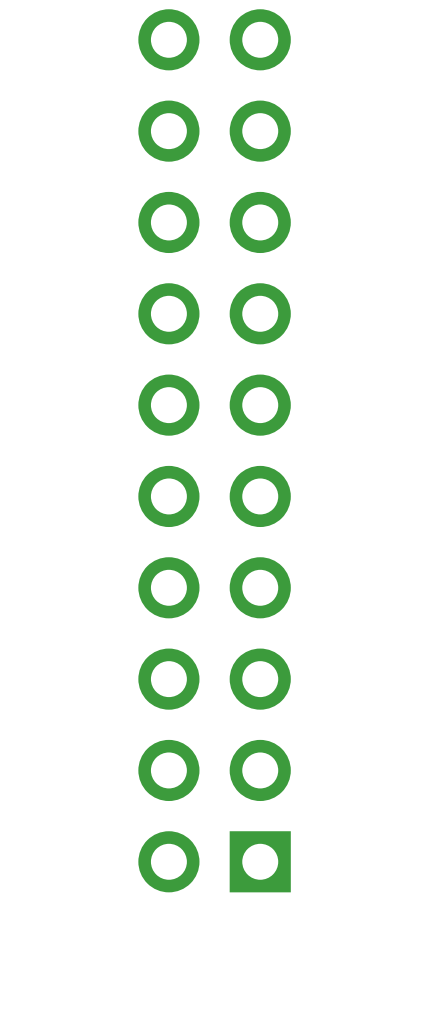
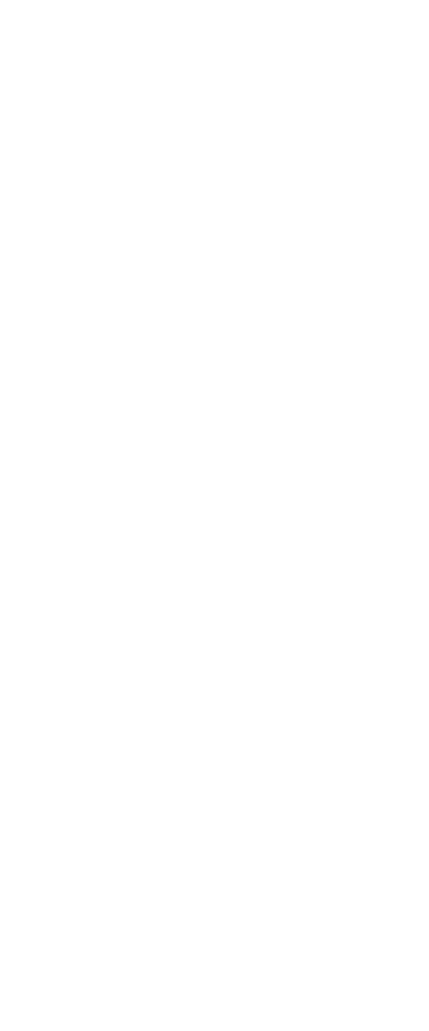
part: (214, 450) -> none

